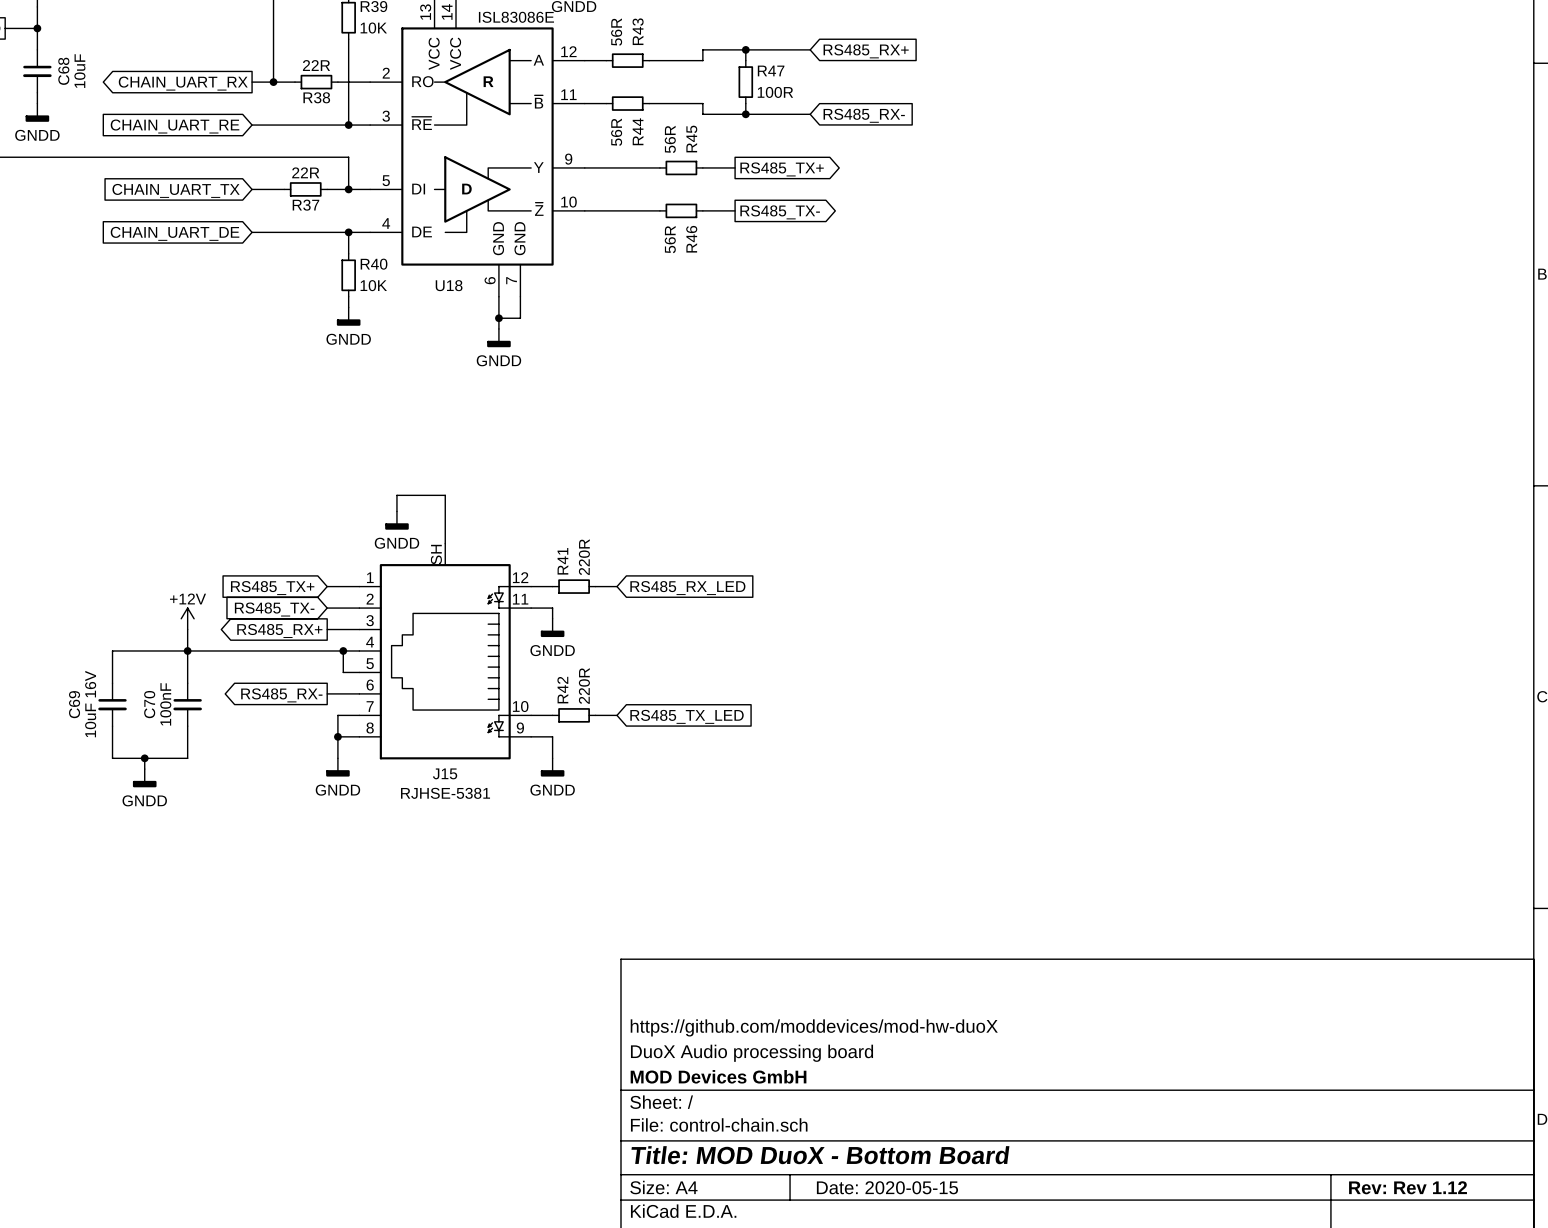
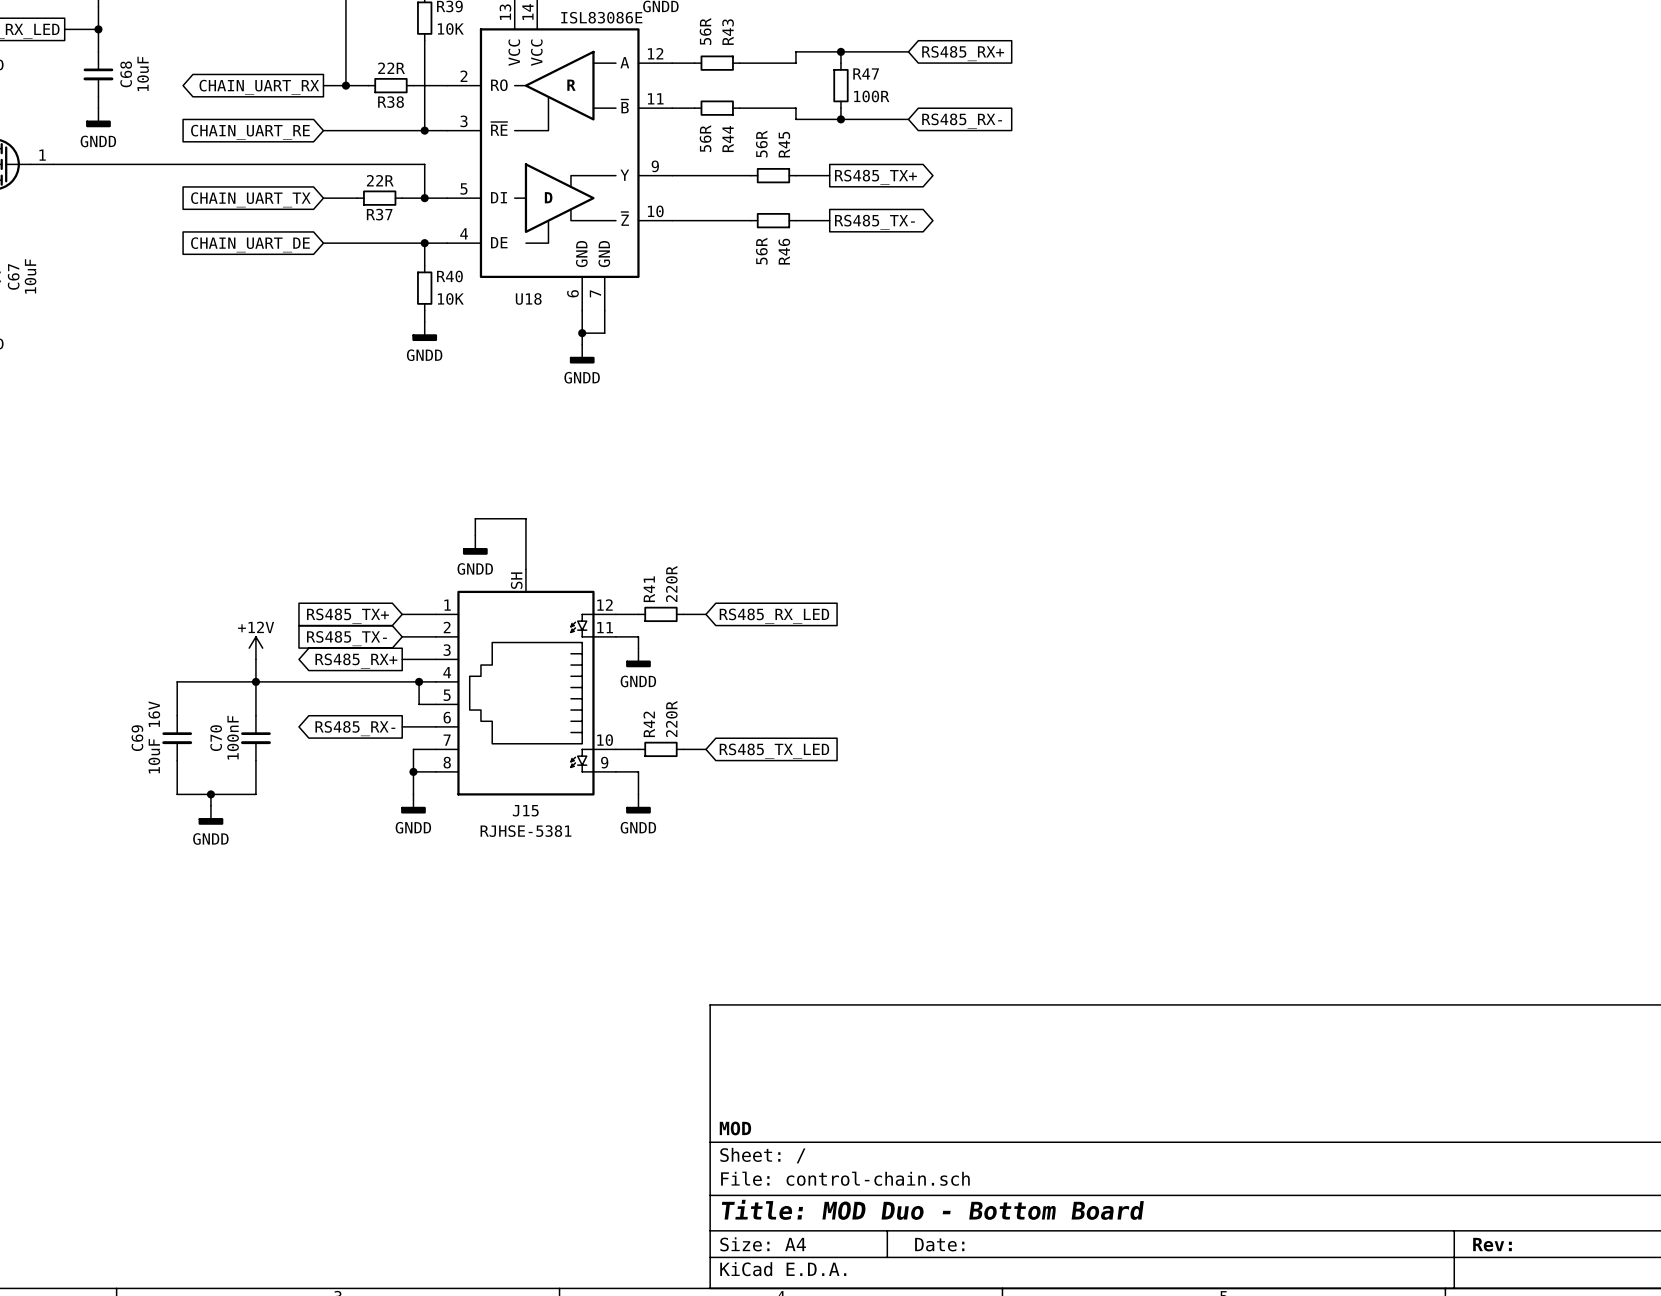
title block: https://github.com/moddevices/mod-hw-duoX (814, 1027) -> none
title block: DuoX Audio processing board (752, 1053) -> none
title block: MOD Devices GmbH (718, 1076) -> MOD (735, 1128)
title block: Title: MOD DuoX - Bottom Board (820, 1155) -> Title: MOD Duo - Bottom Board (932, 1209)
title block: Date: 2020-05-15 (887, 1187) -> Date: (939, 1244)
title block: Rev: Rev 1.12 (1408, 1187) -> Rev: (1492, 1244)

